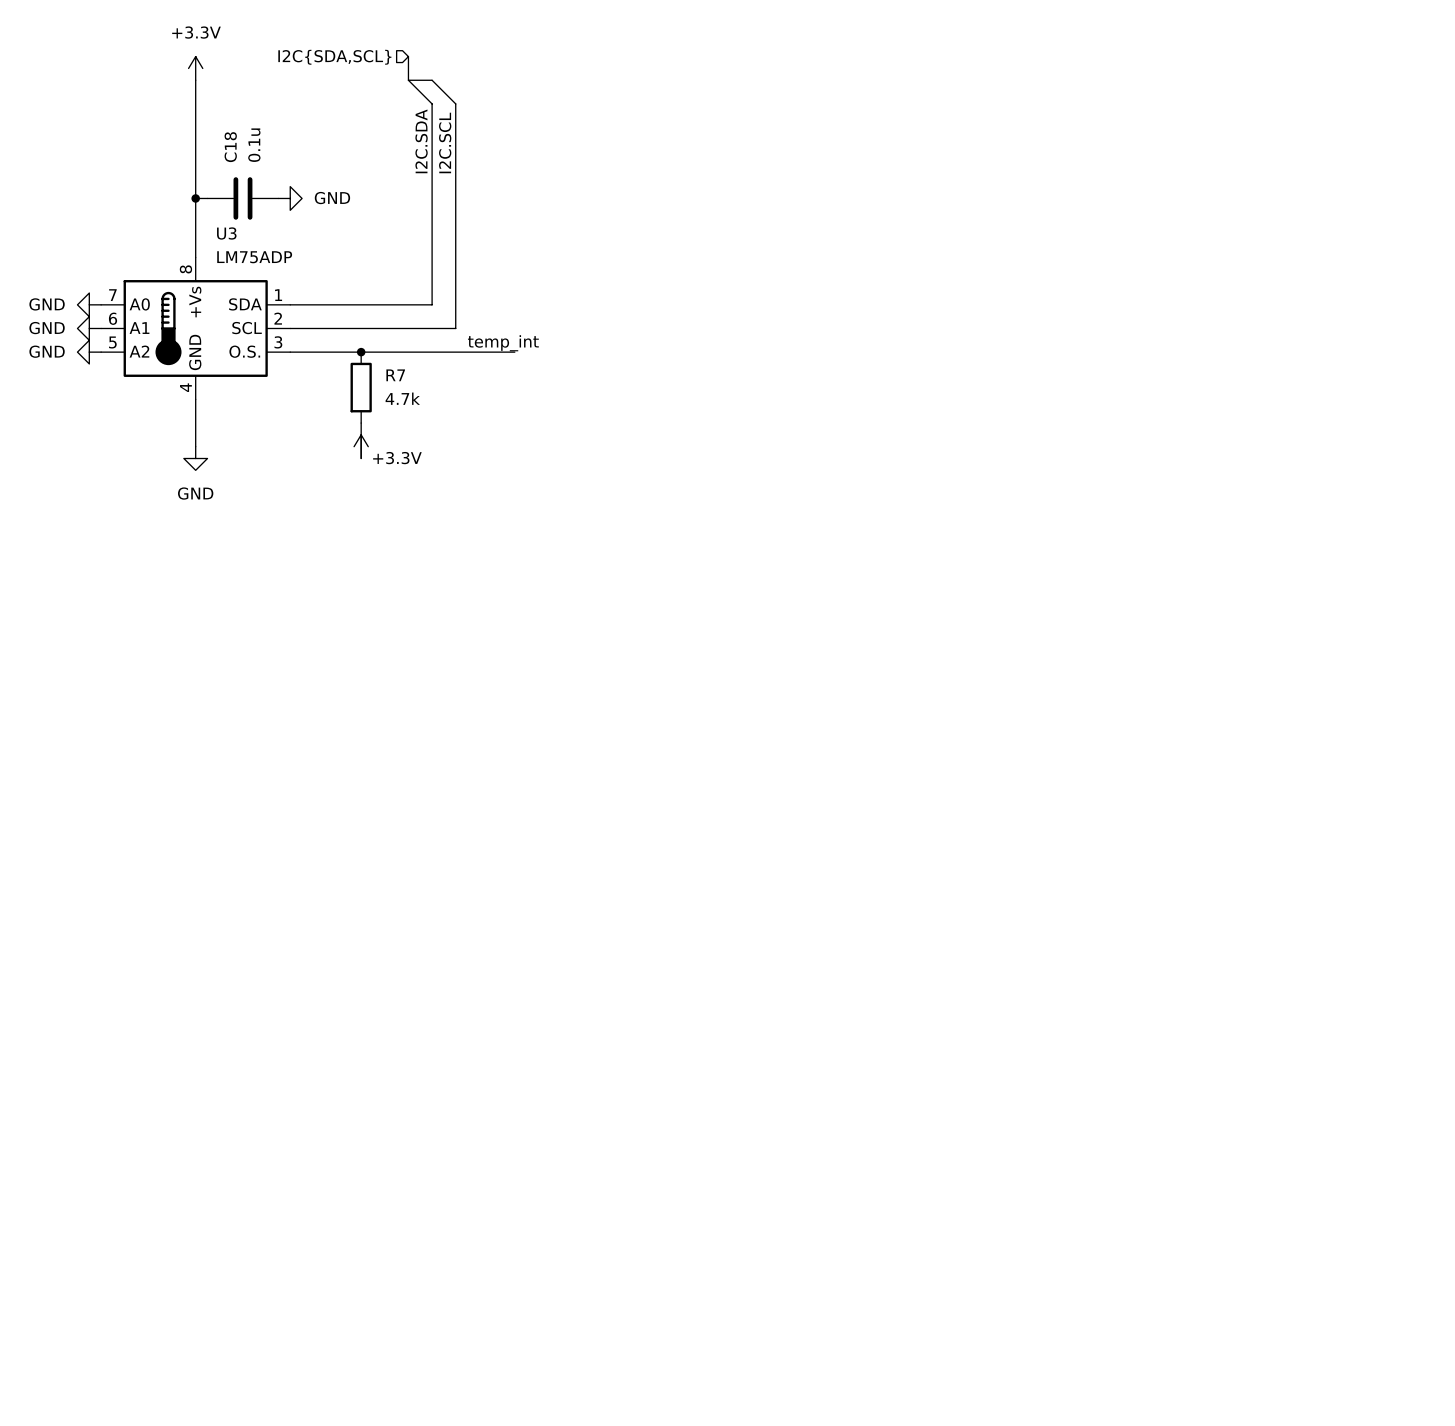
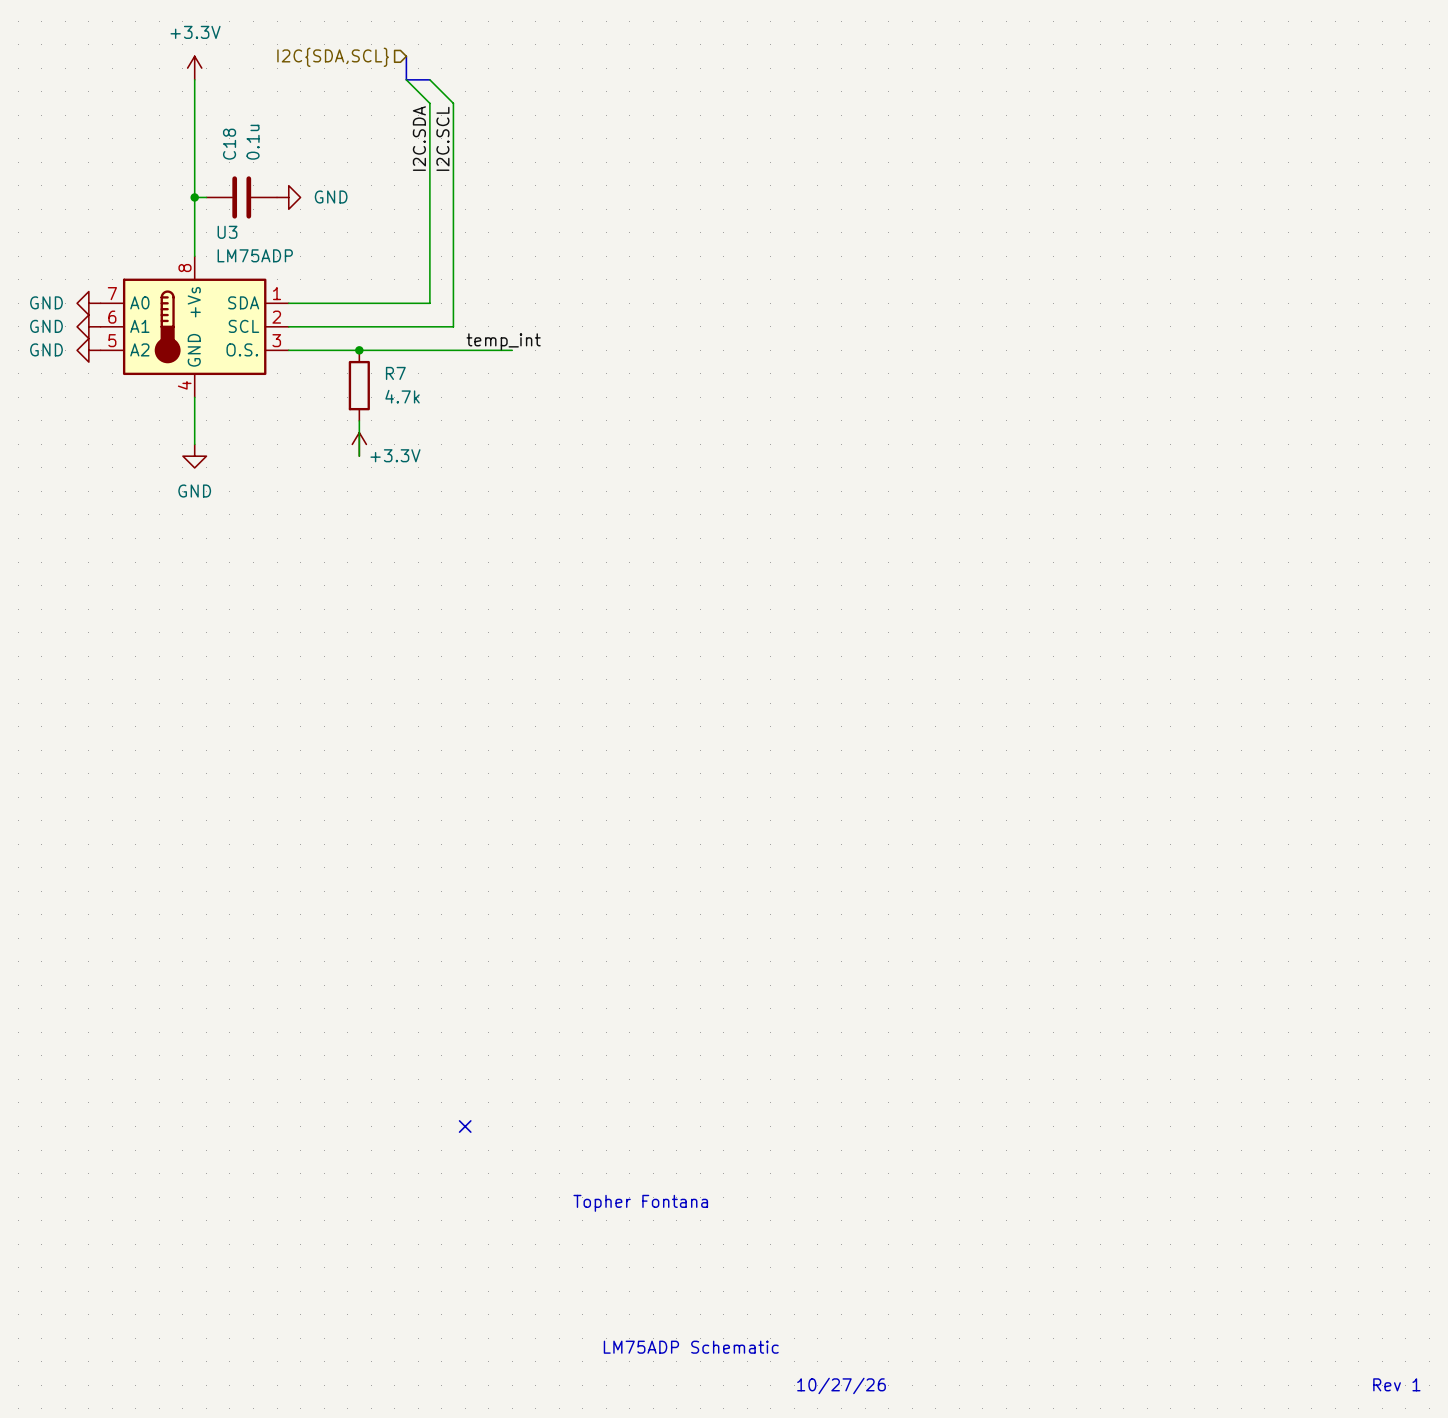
no-connect mark: none -> (465, 1126)
text: none -> Topher Fontana (640, 1203)
text: none -> LM75ADP Schematic (691, 1347)
text: none -> 10/27/26 (841, 1385)
text: none -> Rev 1 (1396, 1384)

